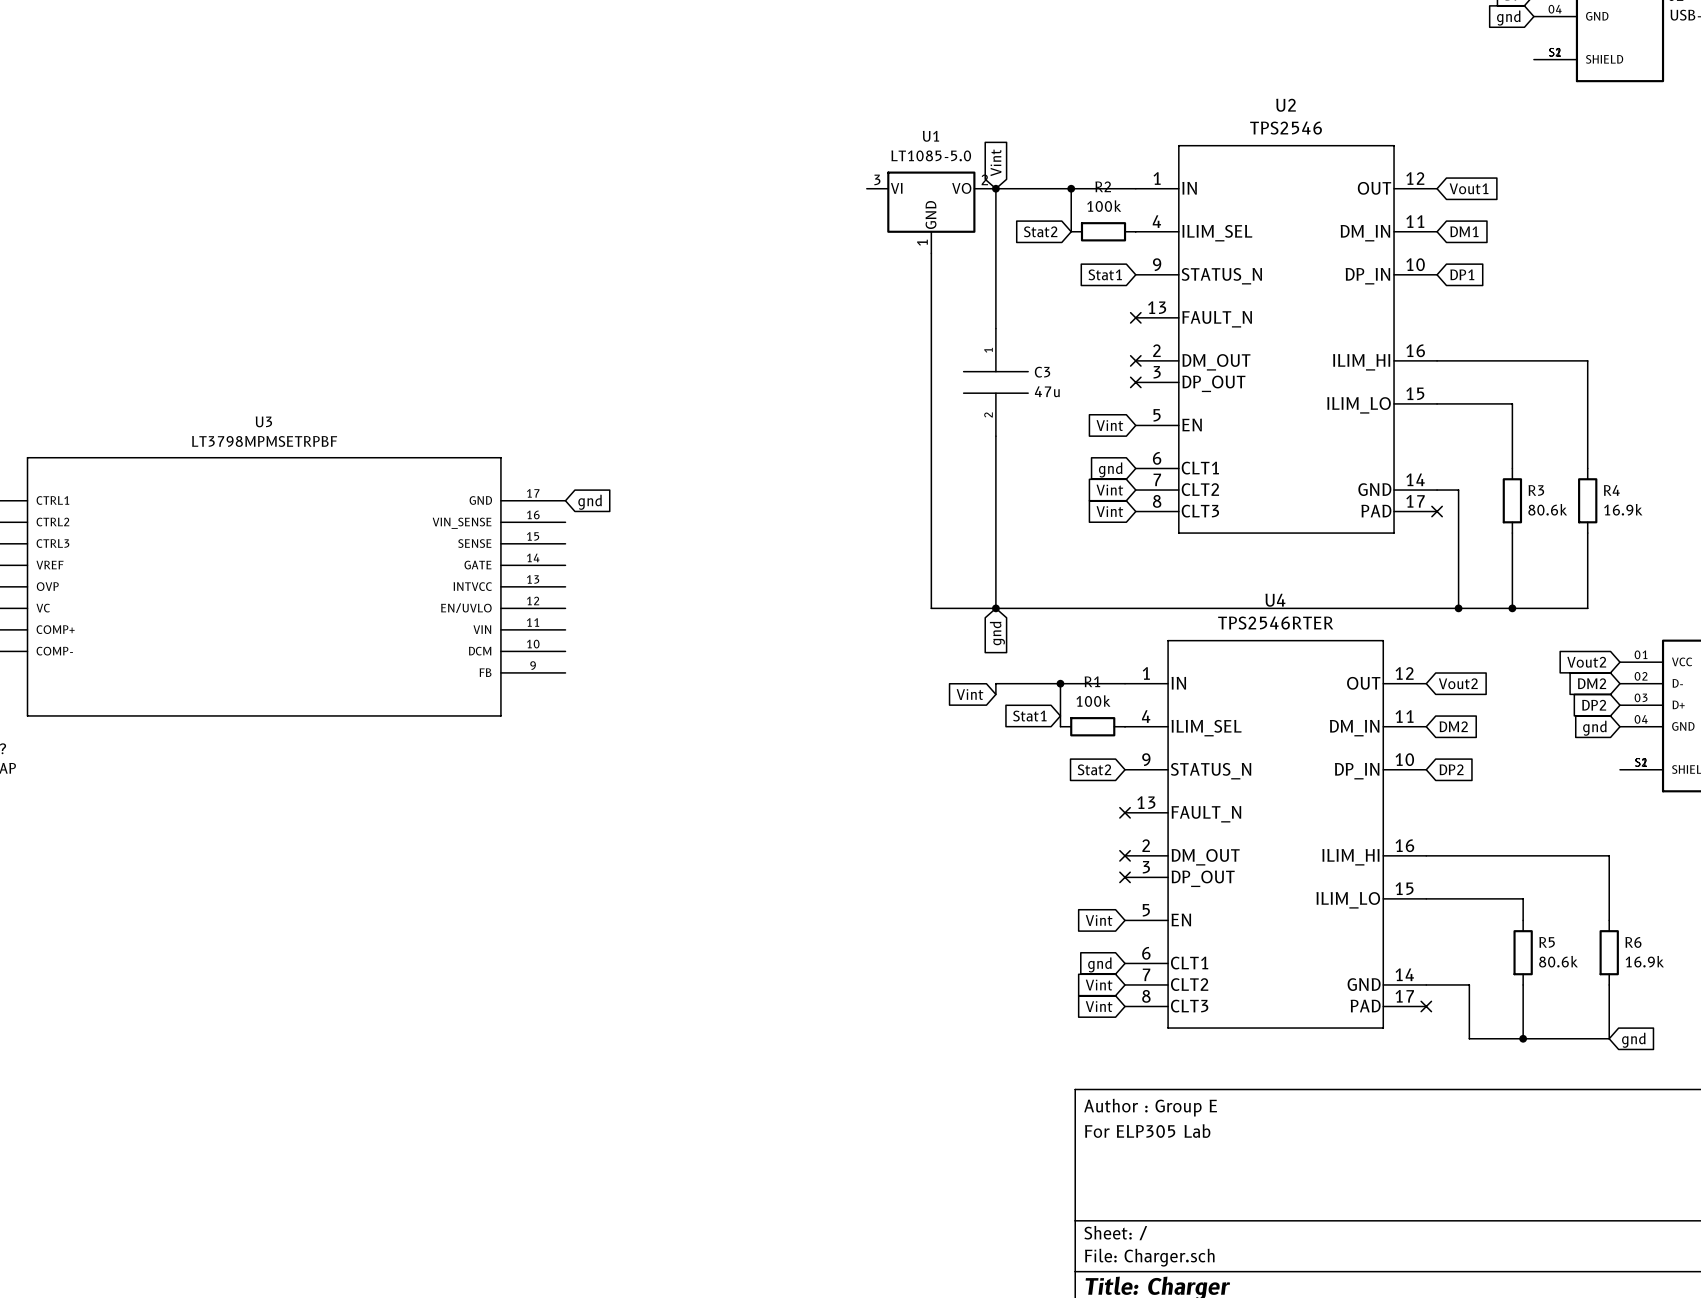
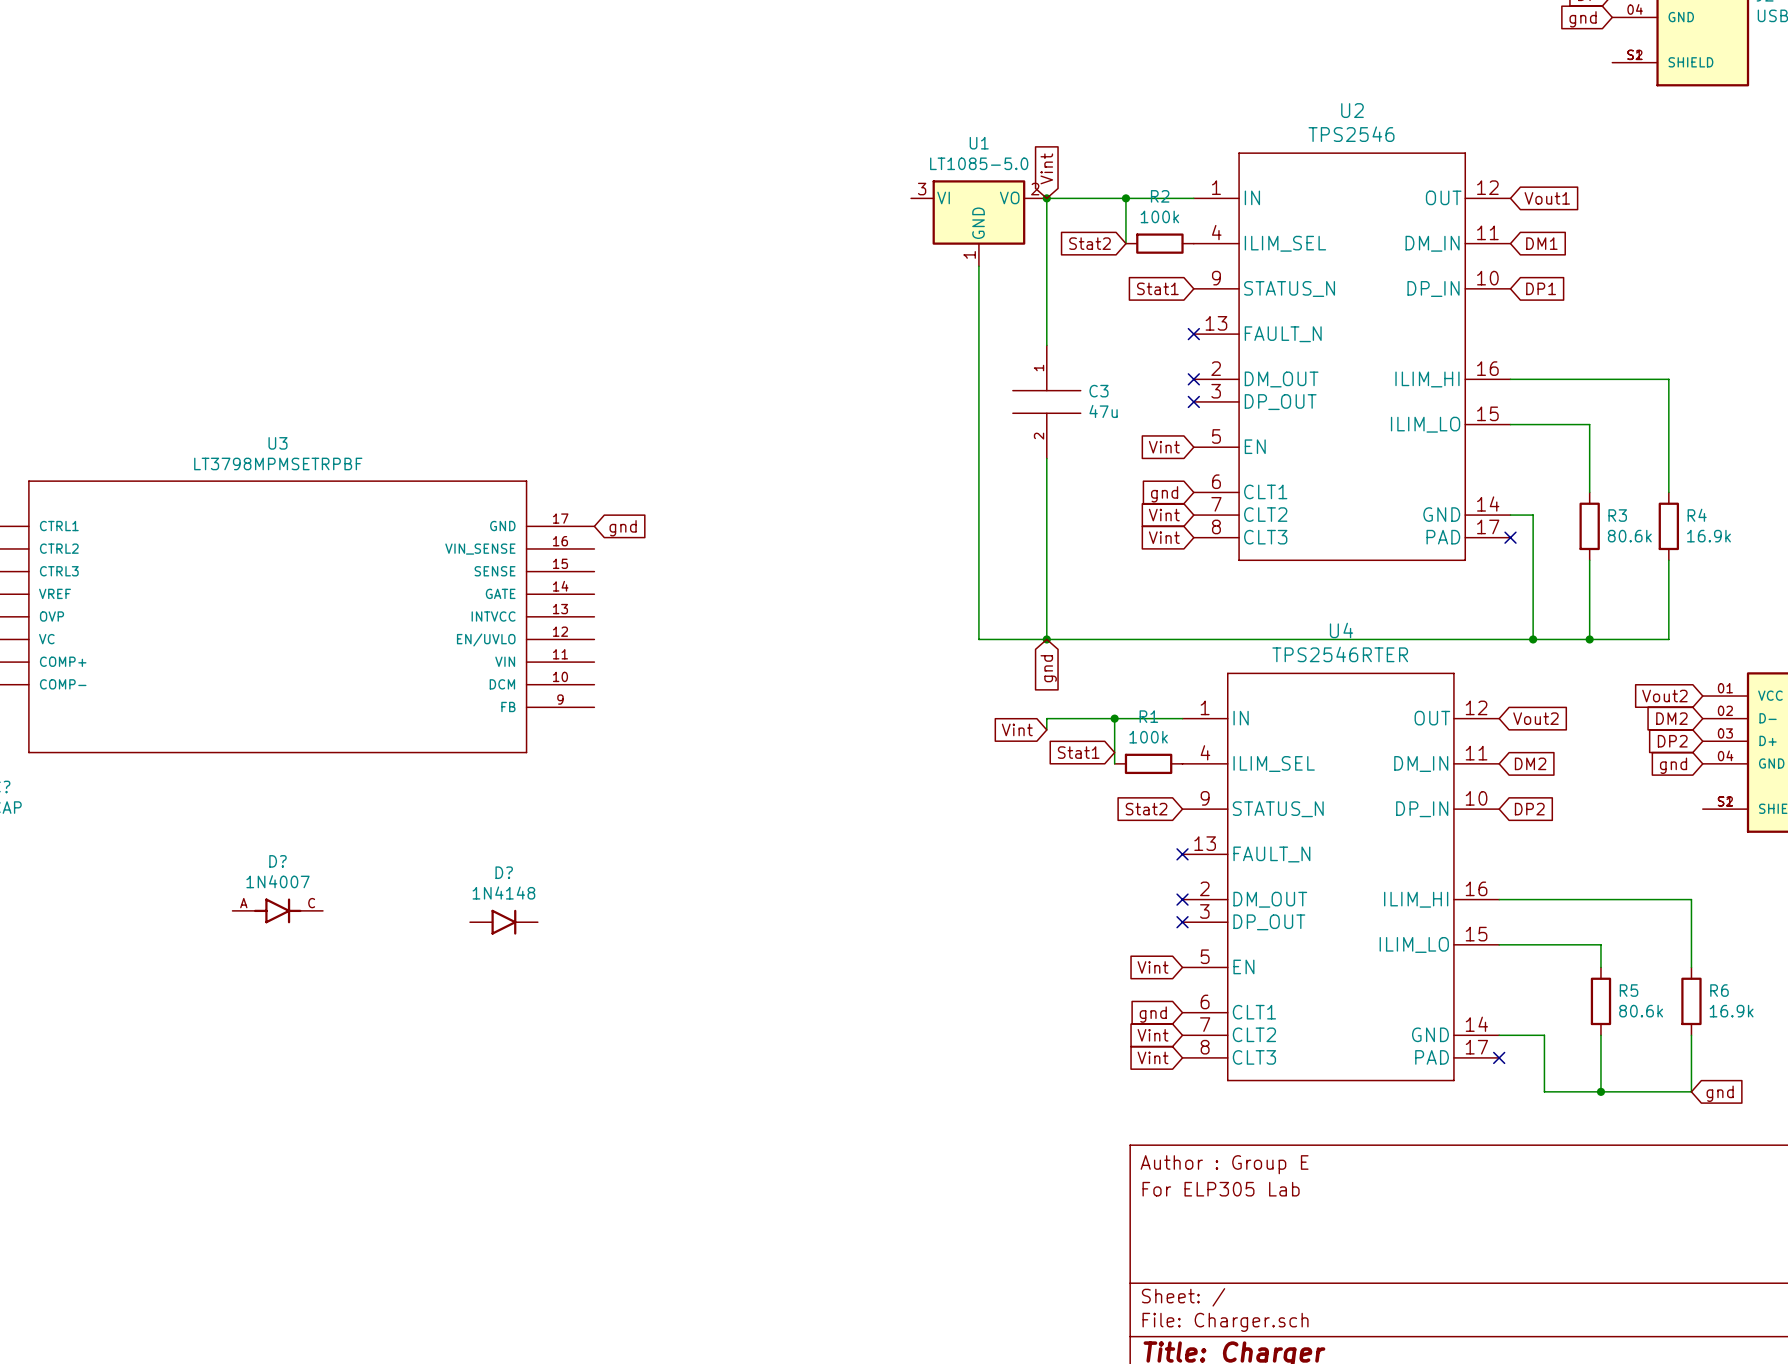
D?: none -> 1N4007 (277, 910)
D?: none -> 1N4148 (503, 922)

